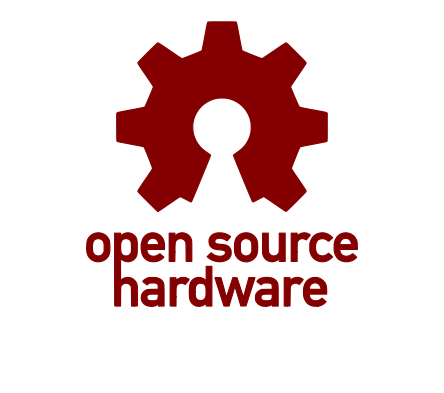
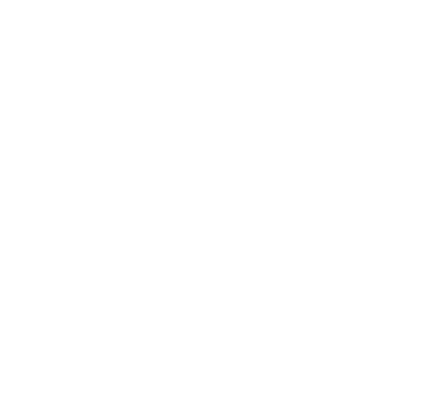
power symbol: (222, 164) -> none

